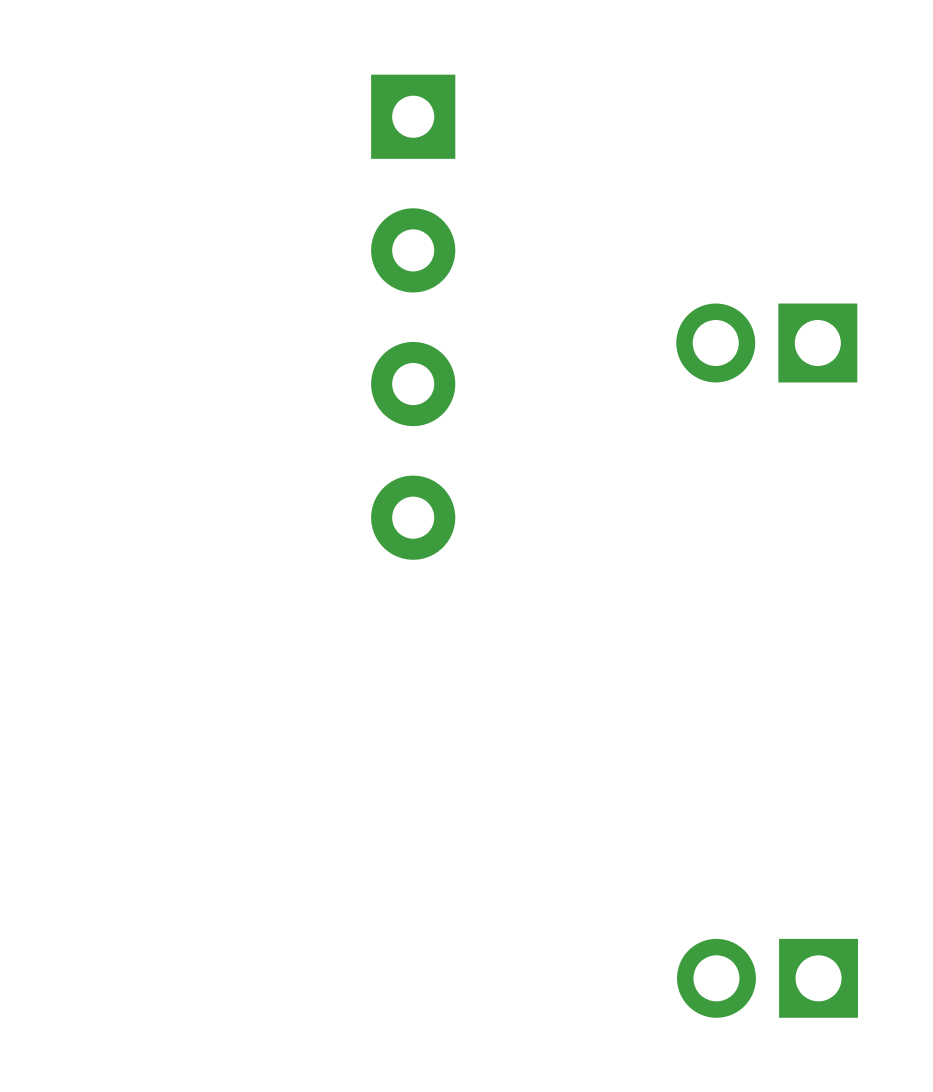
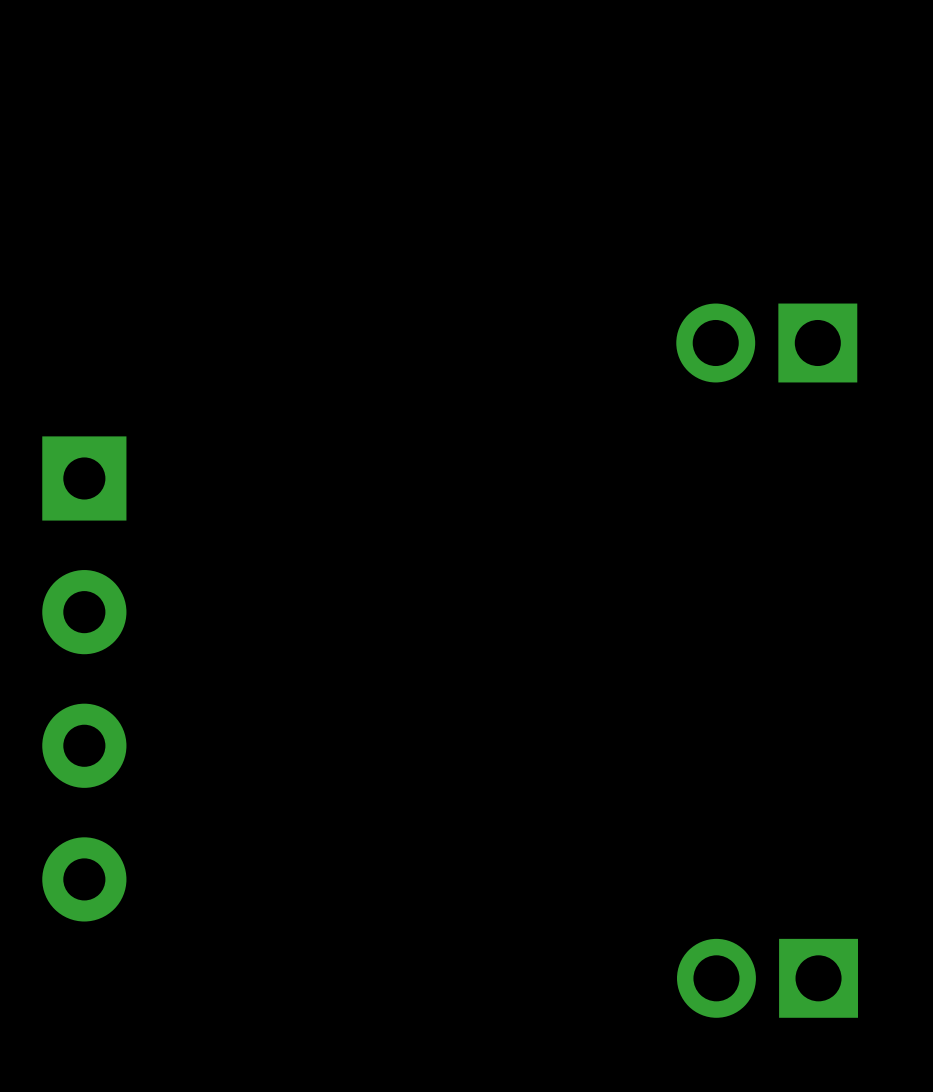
part position: (413, 317) -> (84, 678)

